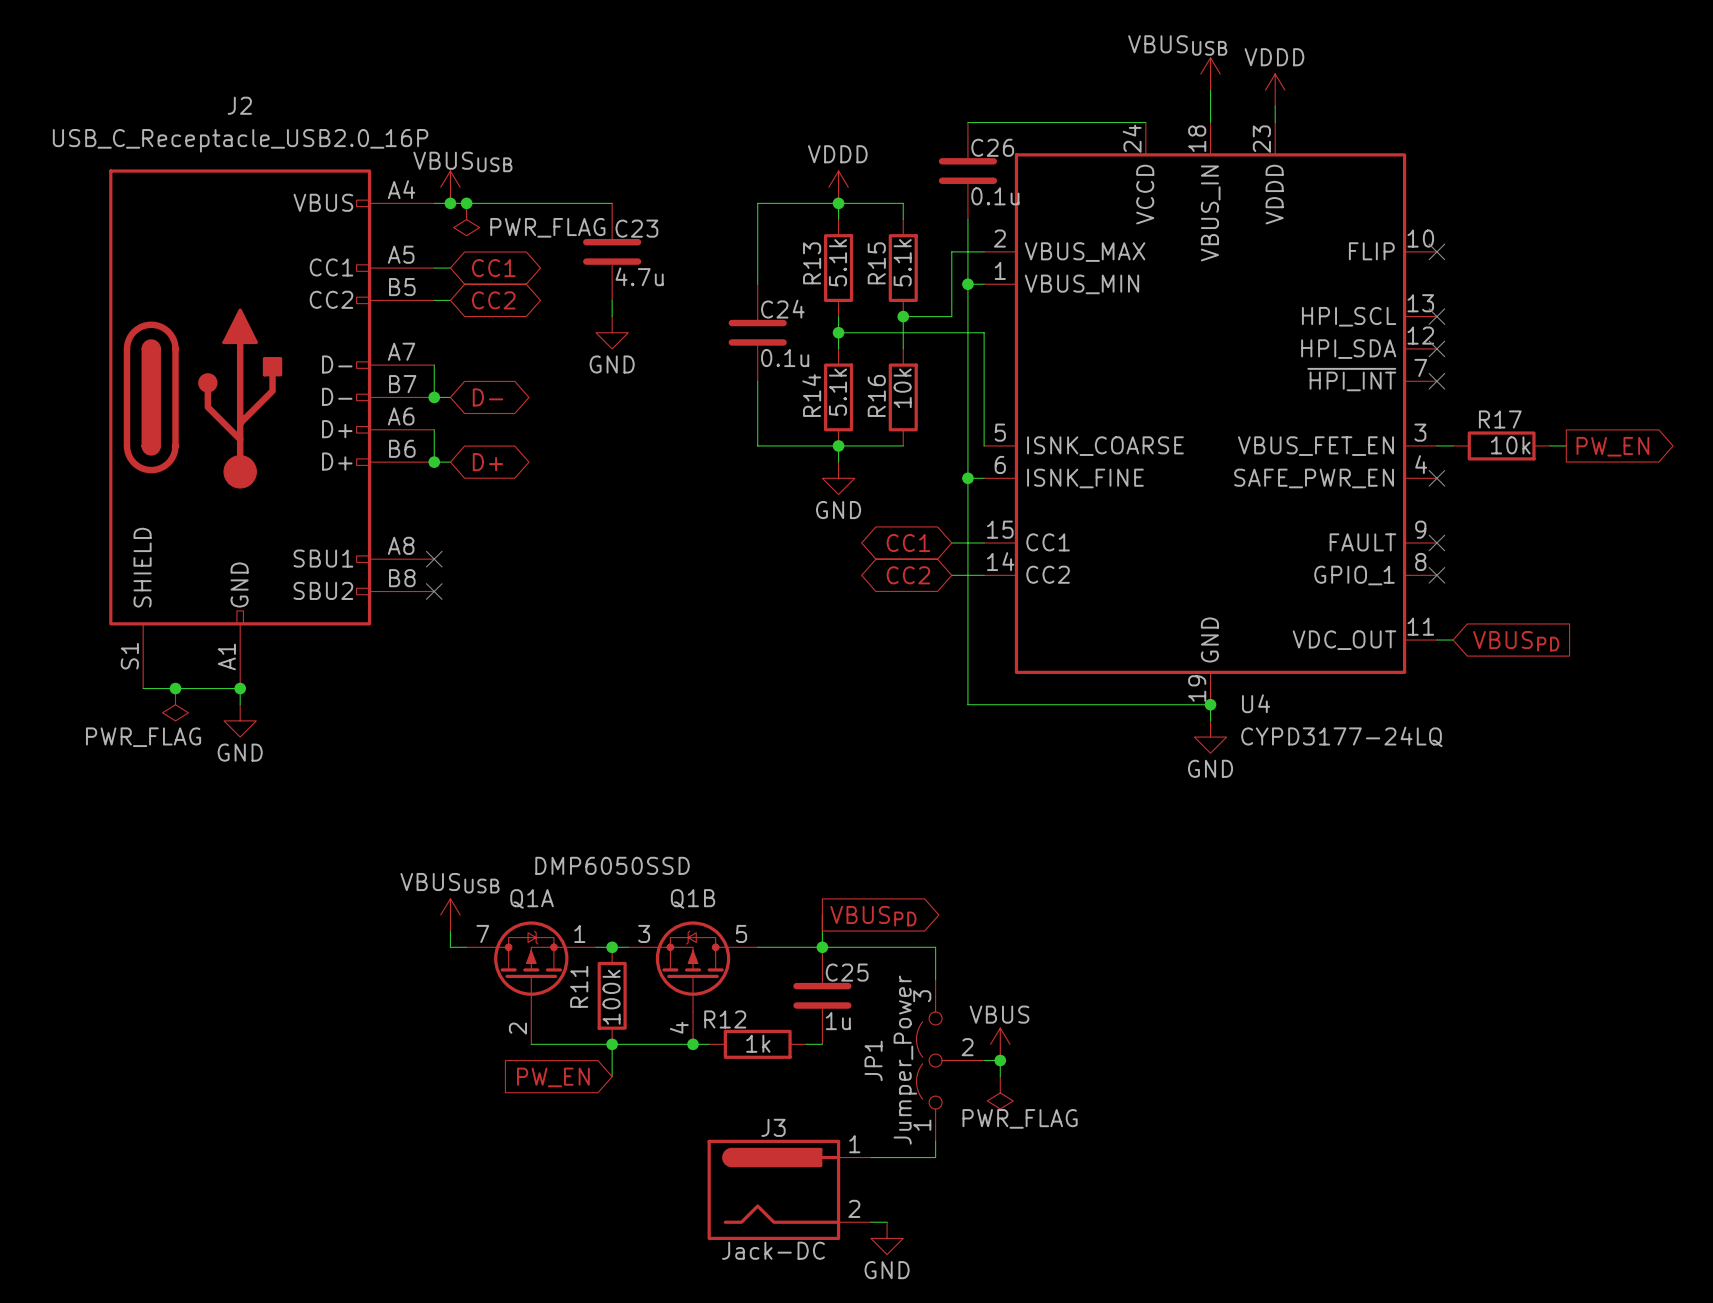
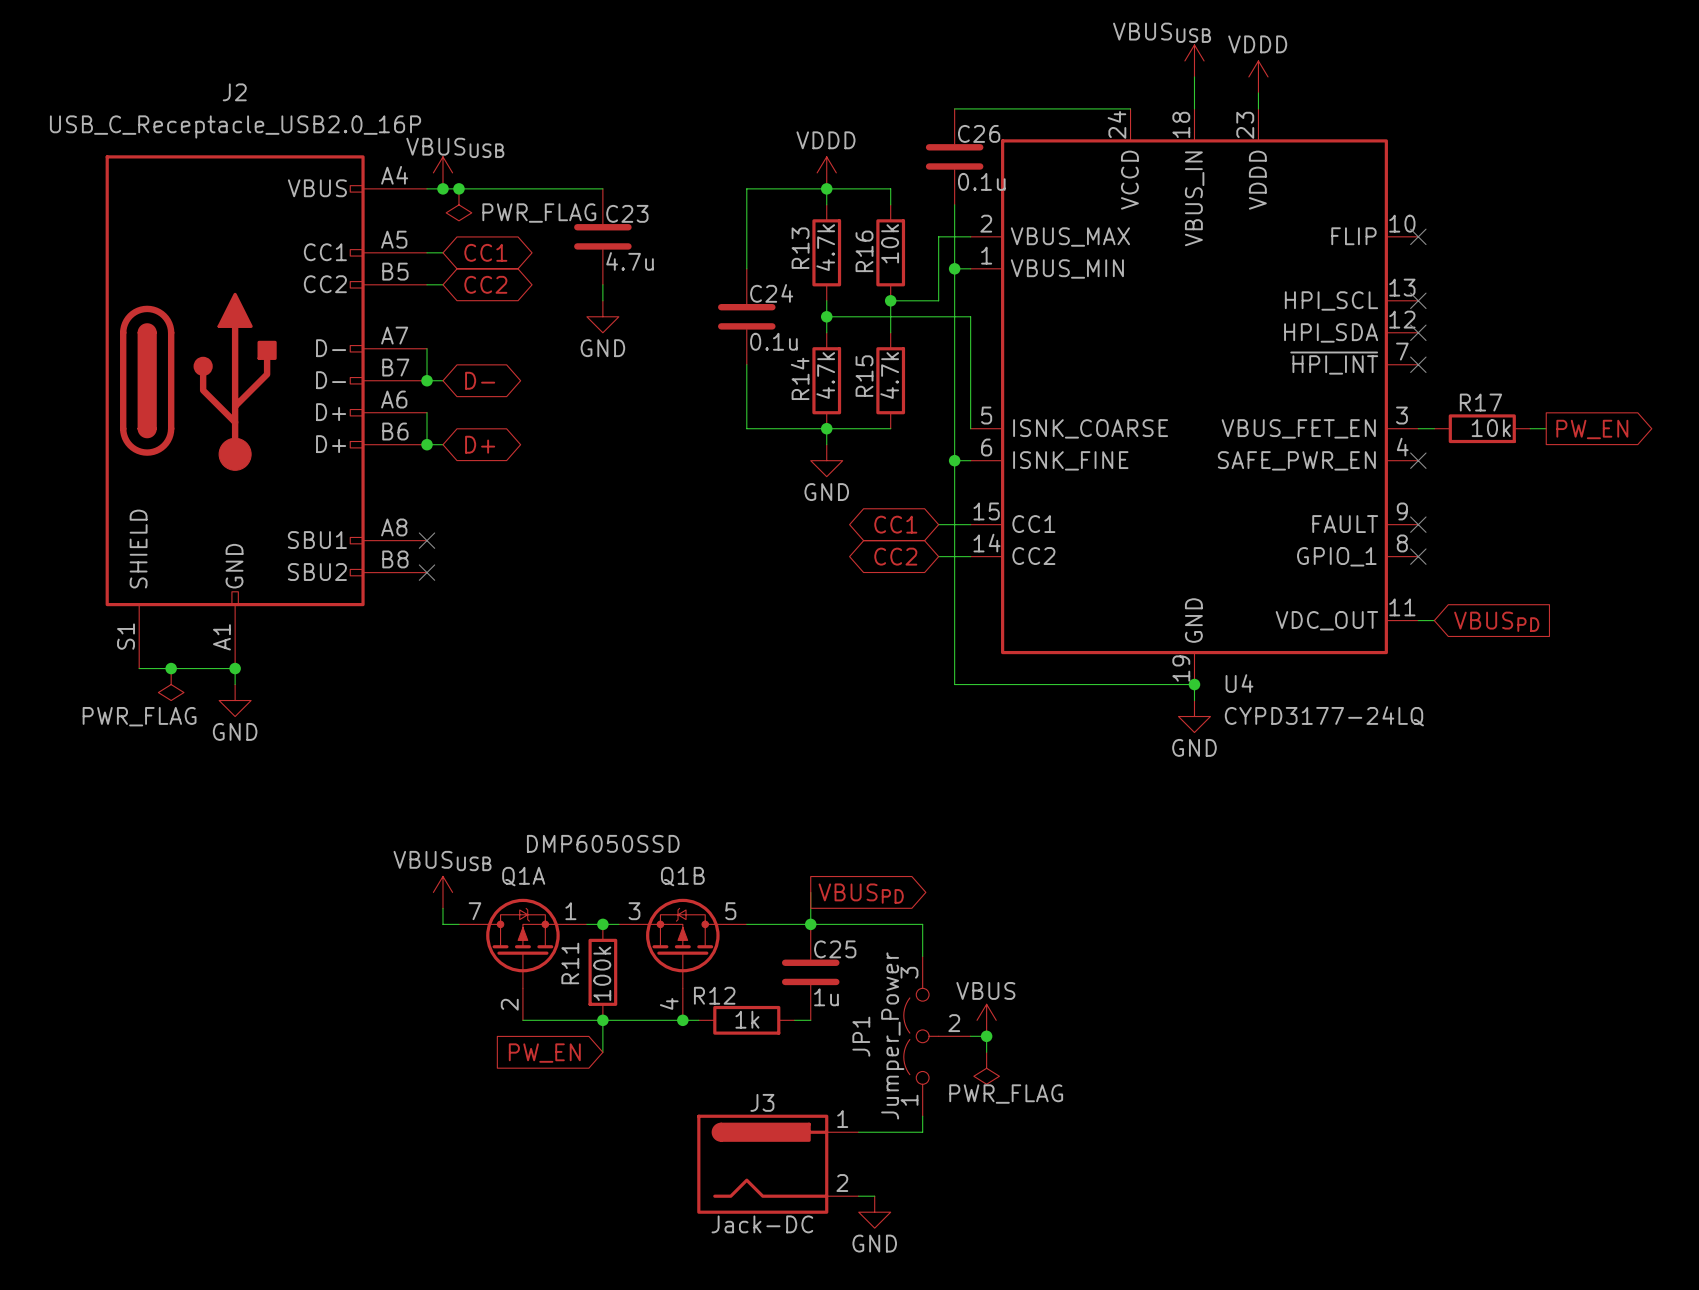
R13 value: 5.1k (837, 262) -> 4.7k (825, 247)
R15 value: 5.1k (902, 262) -> 10k (890, 243)
R15 name: R15 (876, 263) -> R16 (864, 251)
R16 value: 10k (902, 388) -> 4.7k (889, 375)
R14 value: 5.1k (837, 392) -> 4.7k (825, 375)
R16 name: R16 (876, 395) -> R15 (864, 376)

